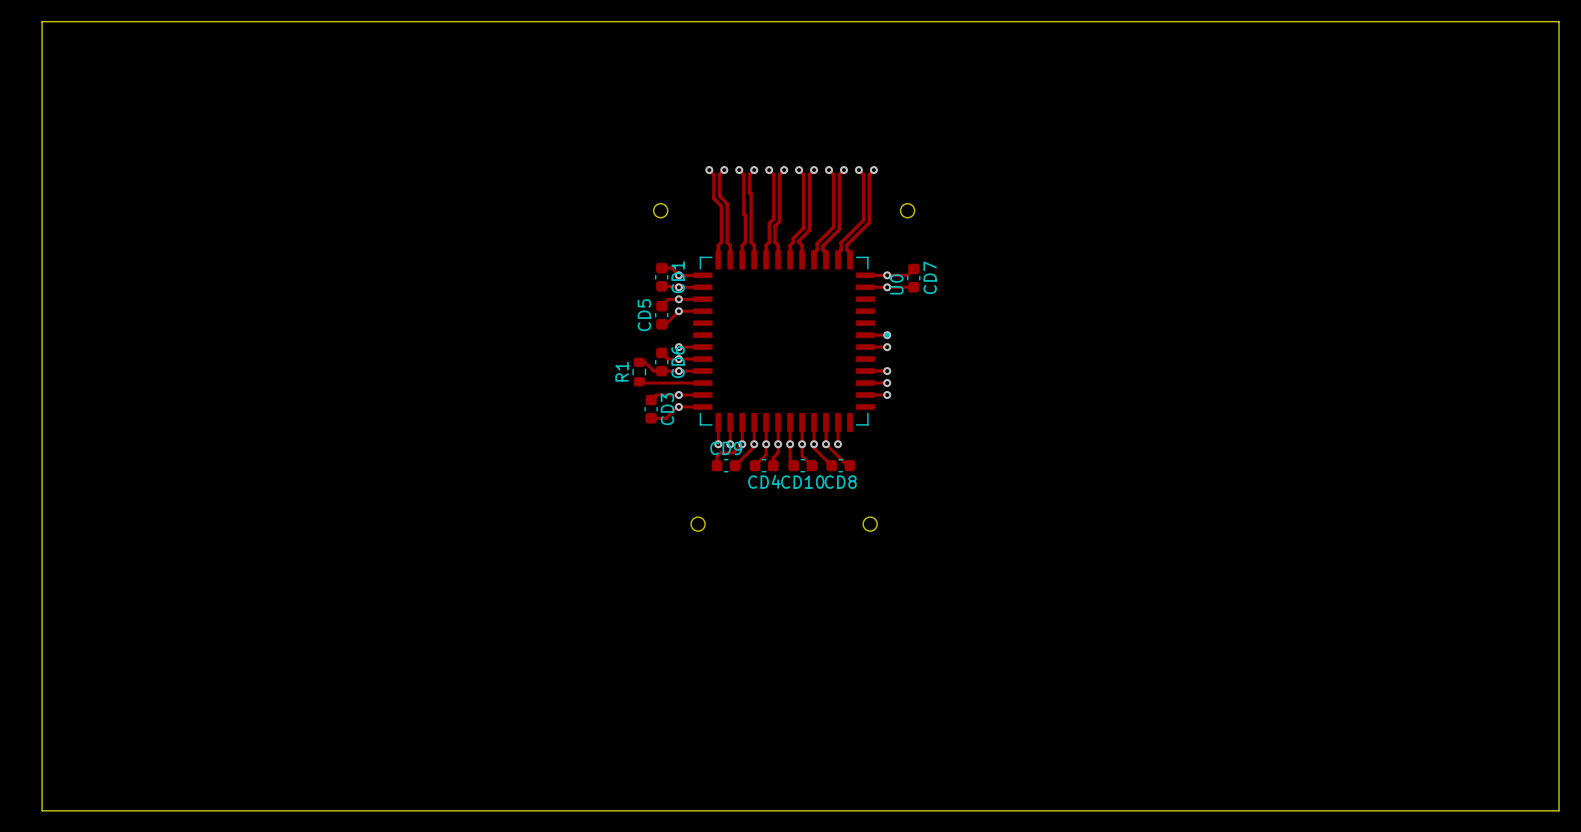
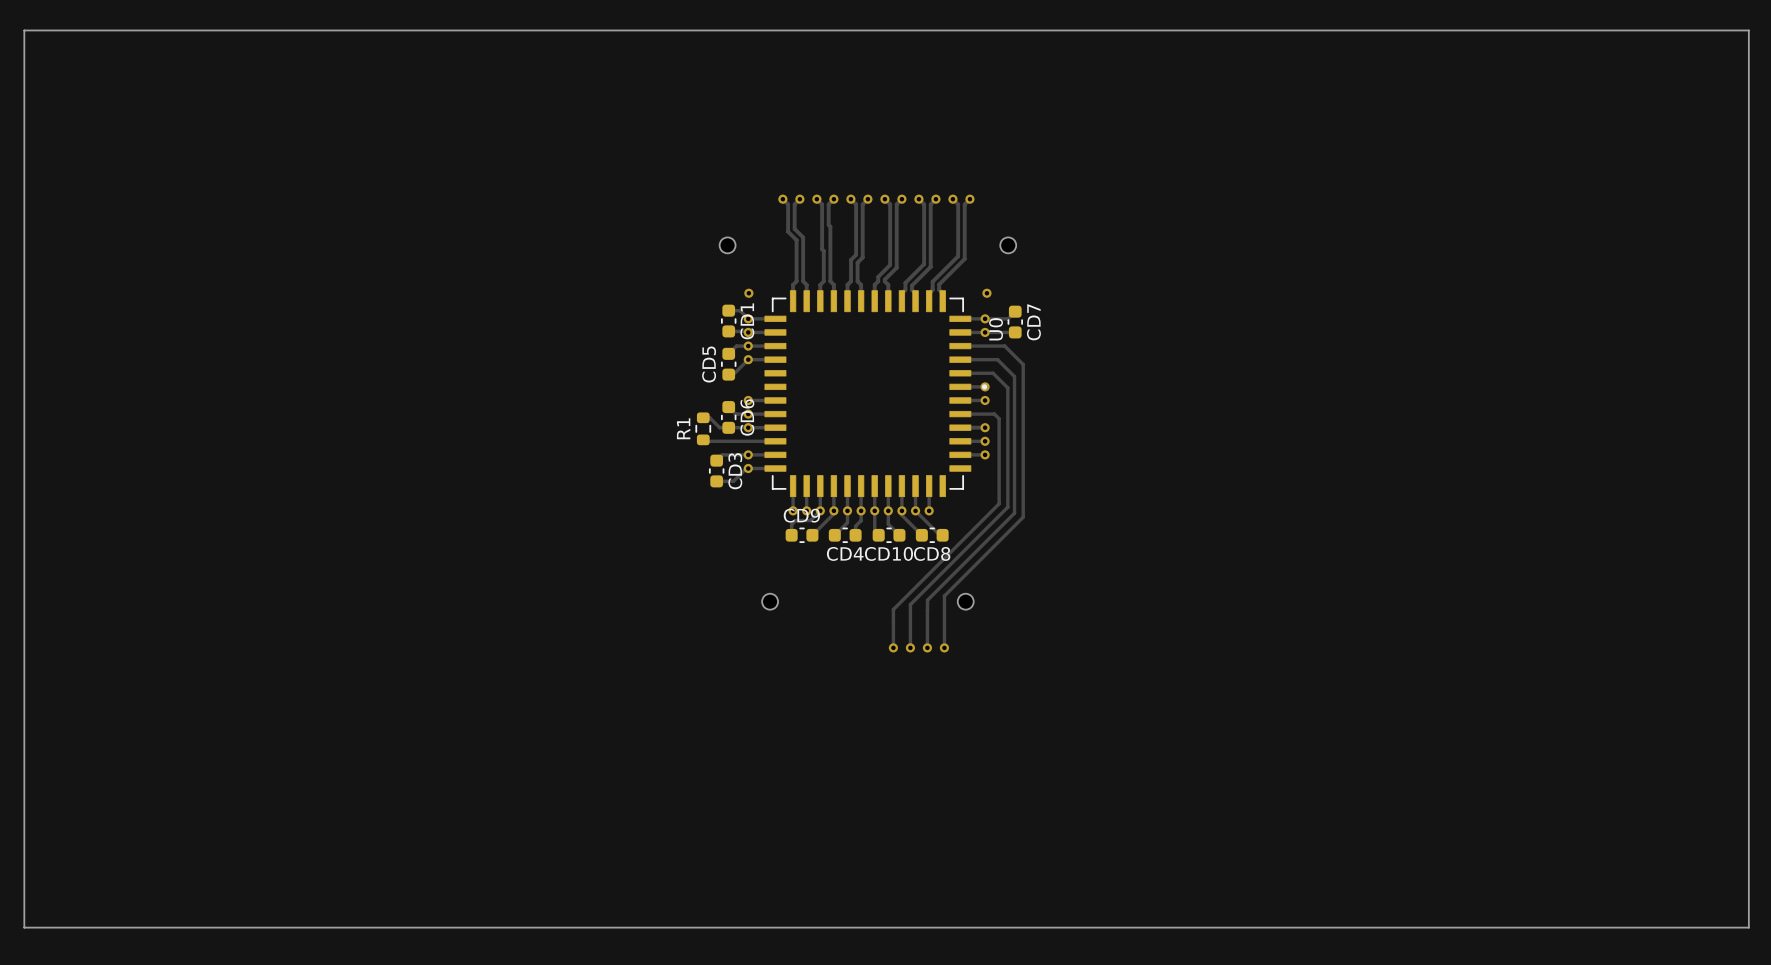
via: none -> (748, 293)
via: none -> (986, 293)
track: none -> (960, 346) (1004, 346) (1023, 364) (1023, 517) (944, 596) (944, 647)
track: none -> (960, 359) (997, 359) (1014, 376) (1014, 513) (927, 600) (927, 610)
track: none -> (960, 373) (993, 373) (1007, 387) (1007, 507) (910, 604) (910, 647)
track: none -> (960, 414) (994, 414) (999, 418) (999, 503) (893, 609) (893, 647)
track: none -> (927, 610) (927, 647)
via: none -> (893, 647)
via: none -> (910, 647)
via: none -> (927, 647)
via: none -> (944, 647)

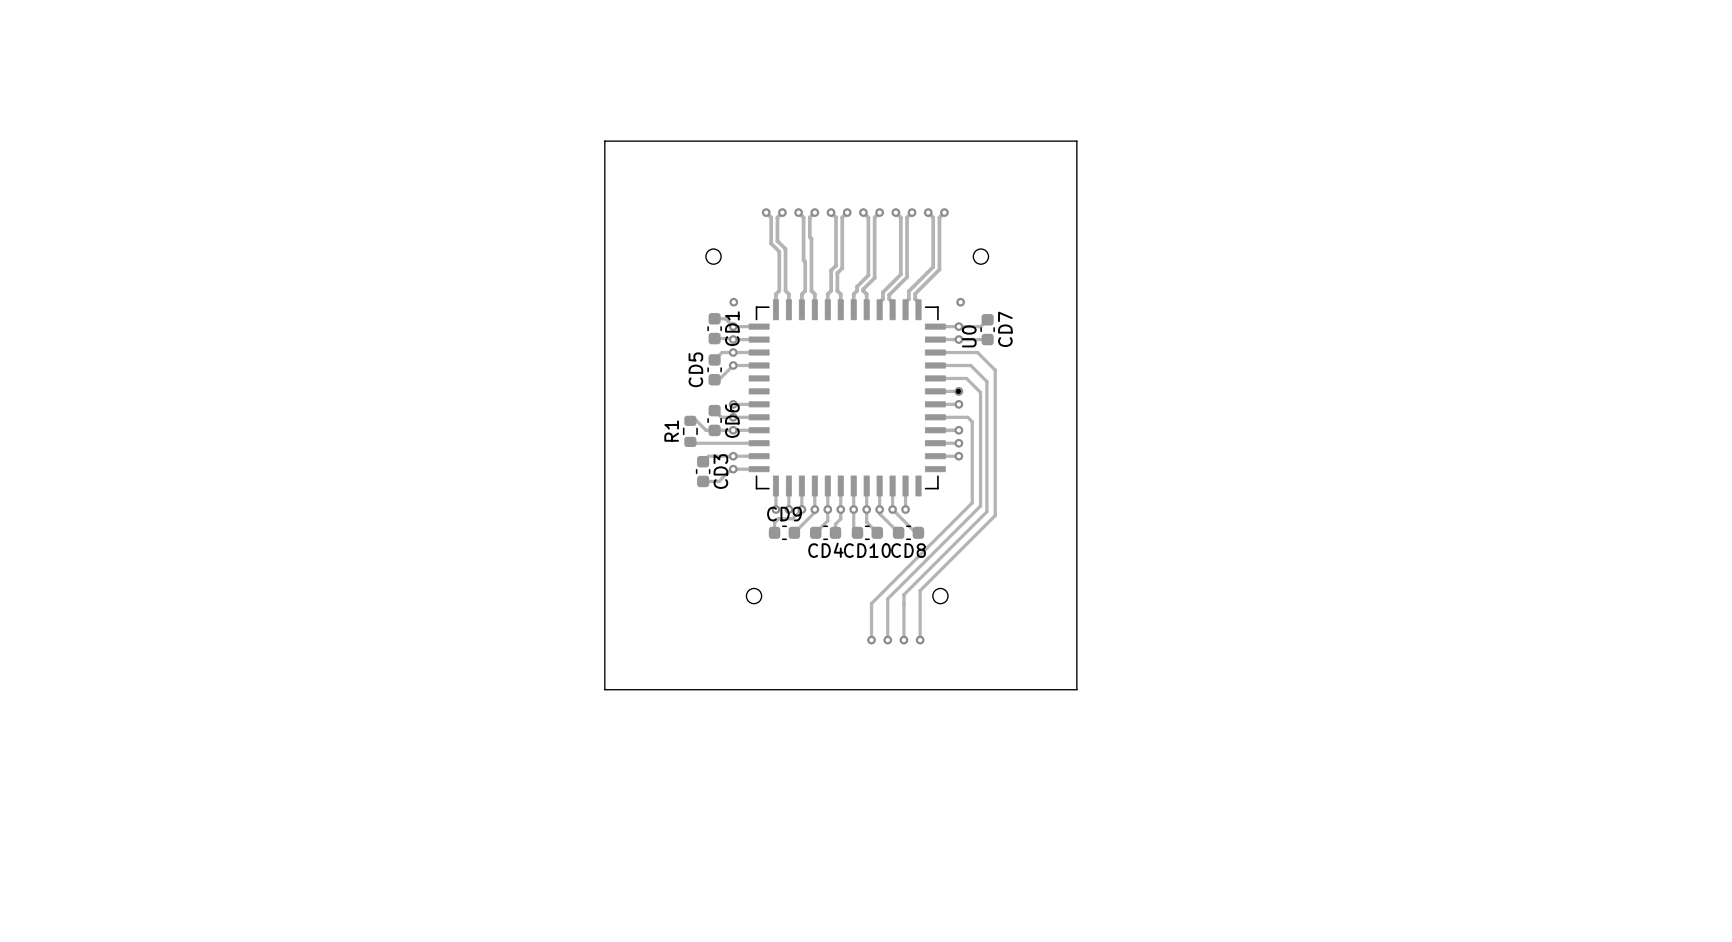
board edge: (24, 30) (1748, 30) (1748, 927) (24, 927) (24, 30) -> none
board edge: none -> (604, 141) (1076, 141) (1076, 689) (604, 689) (604, 141)

